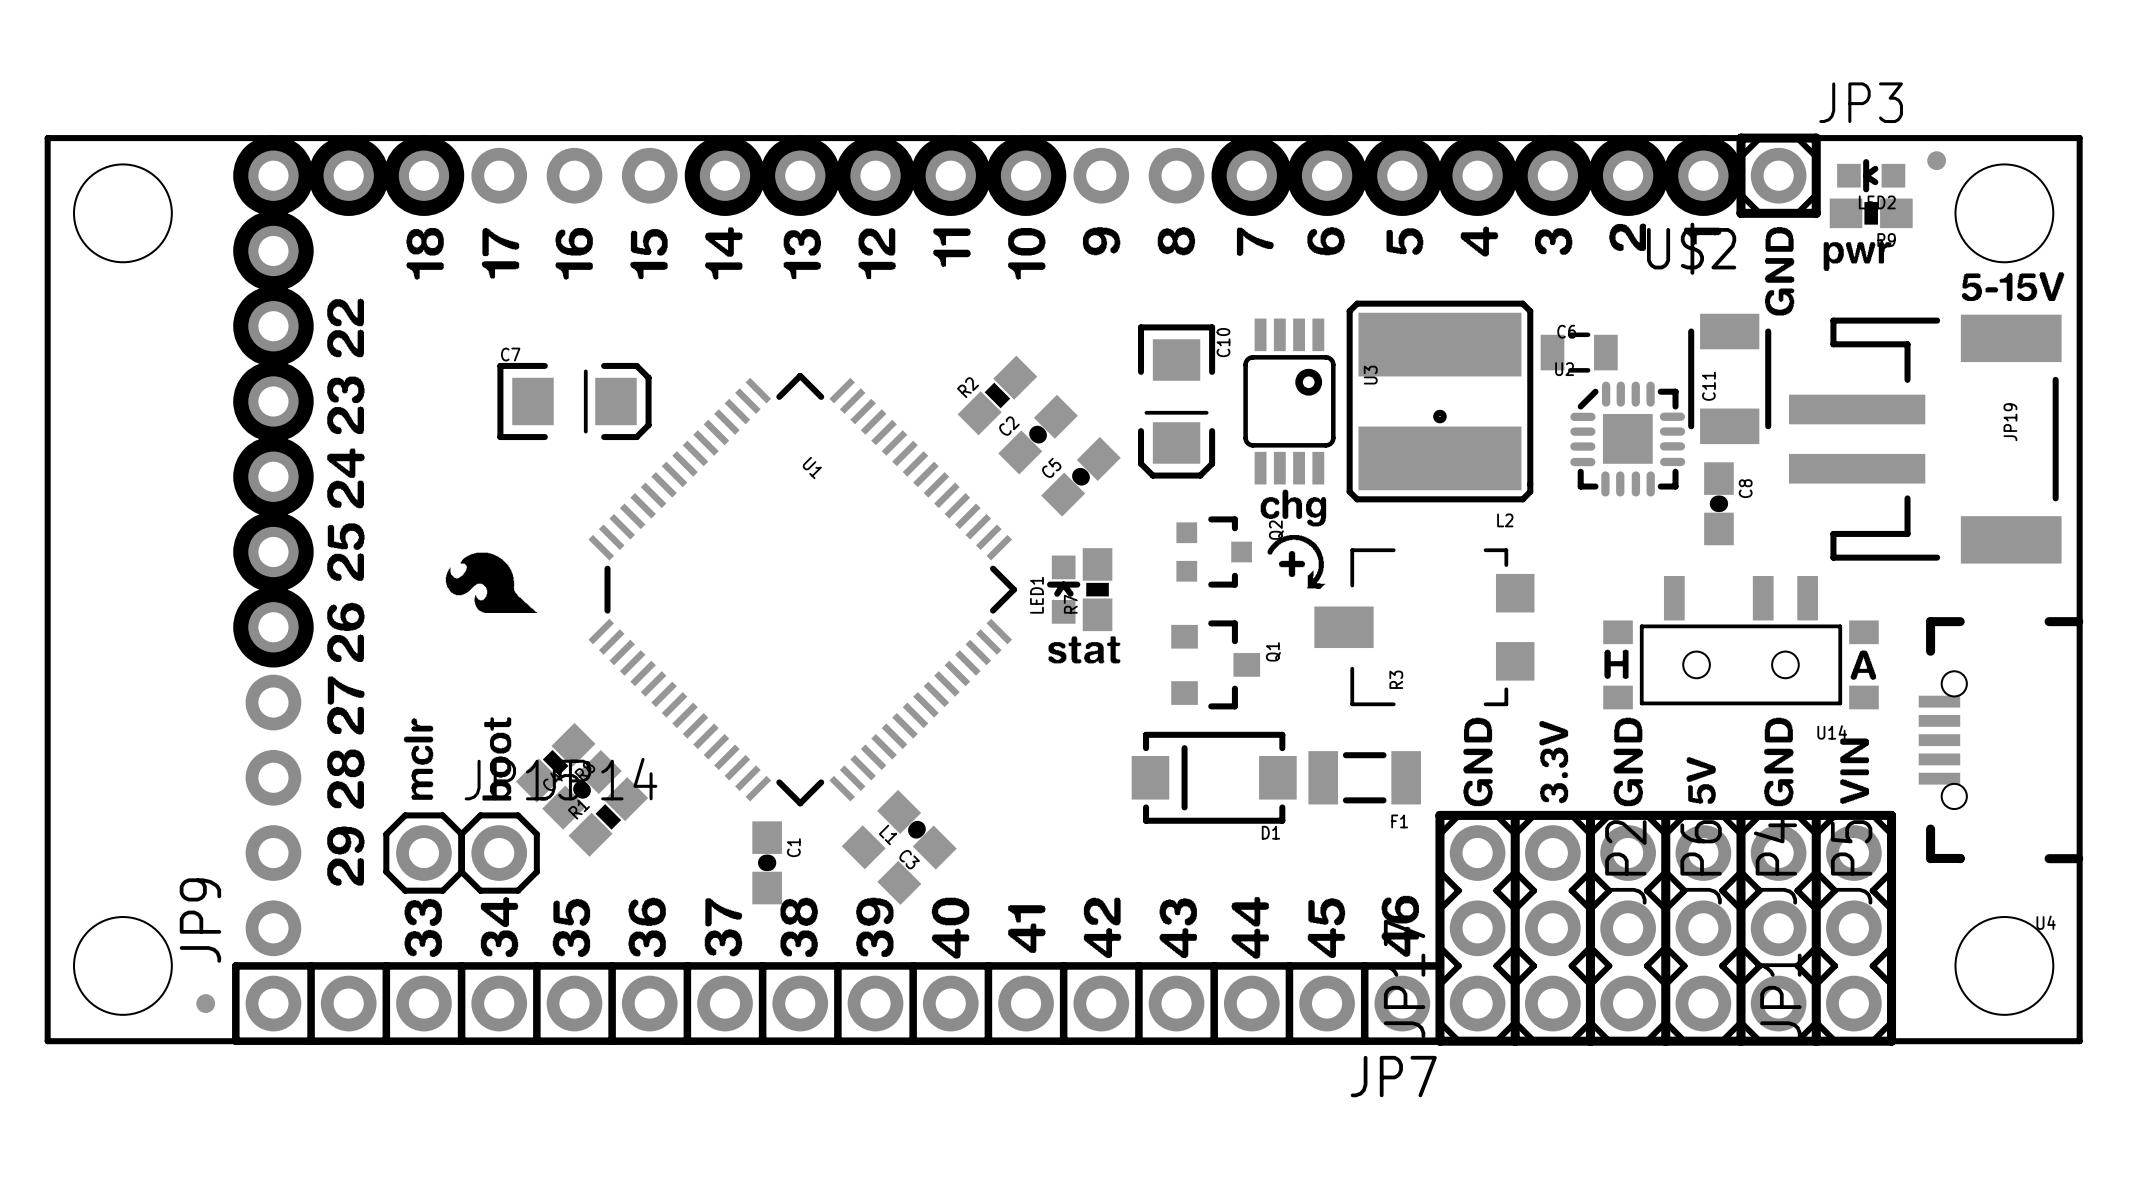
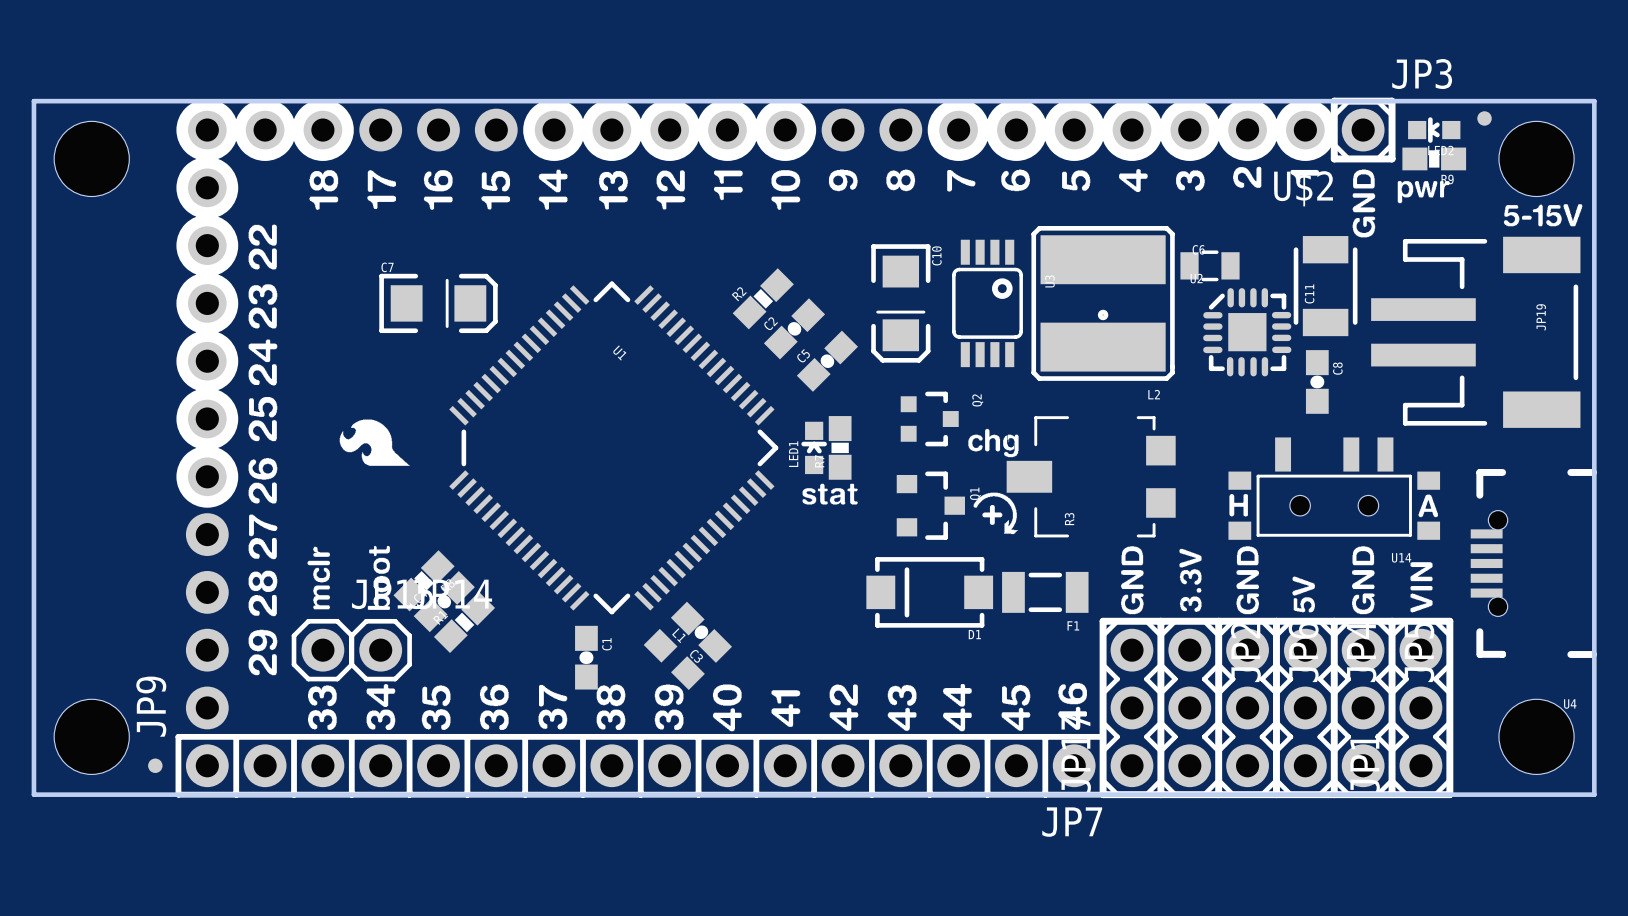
drawing: [1260, 489, 1327, 589] -> none
drawing: none -> [968, 428, 1019, 458]
drawing: none -> [973, 492, 1019, 535]

